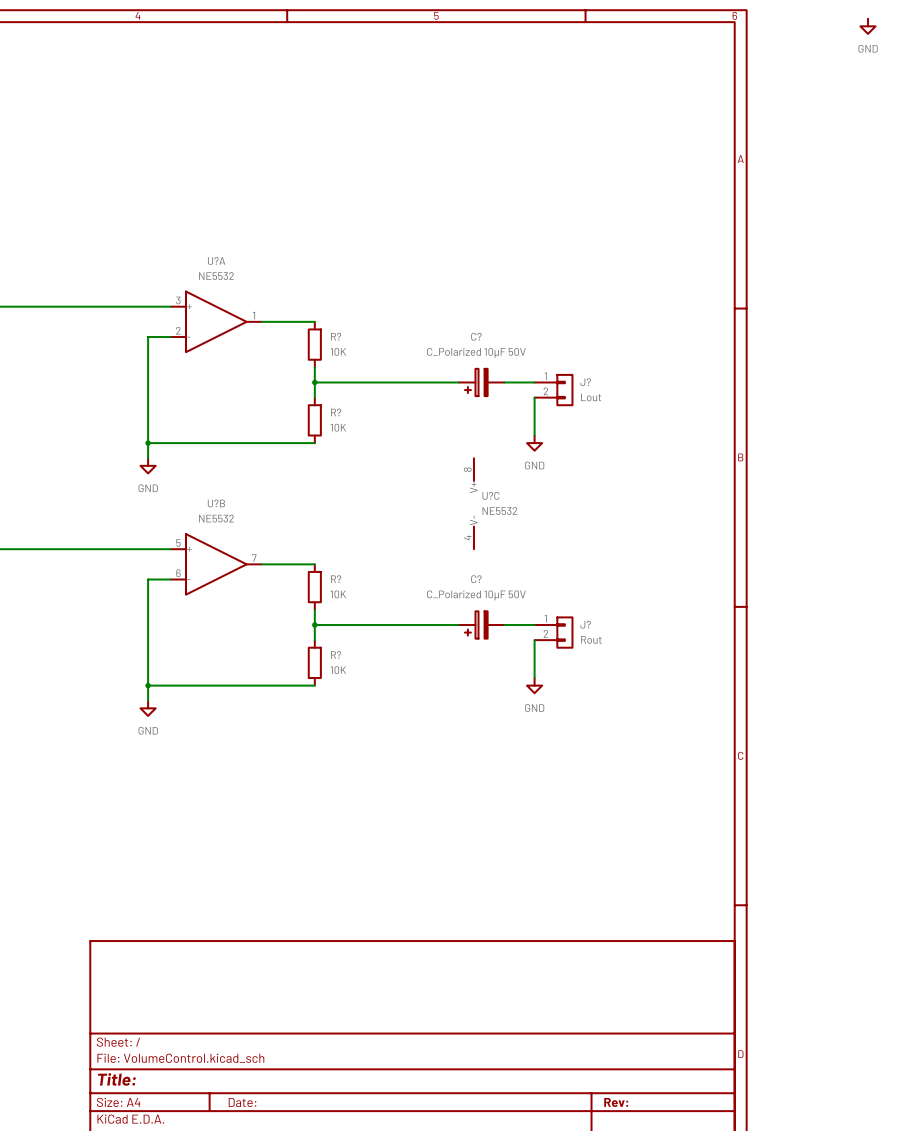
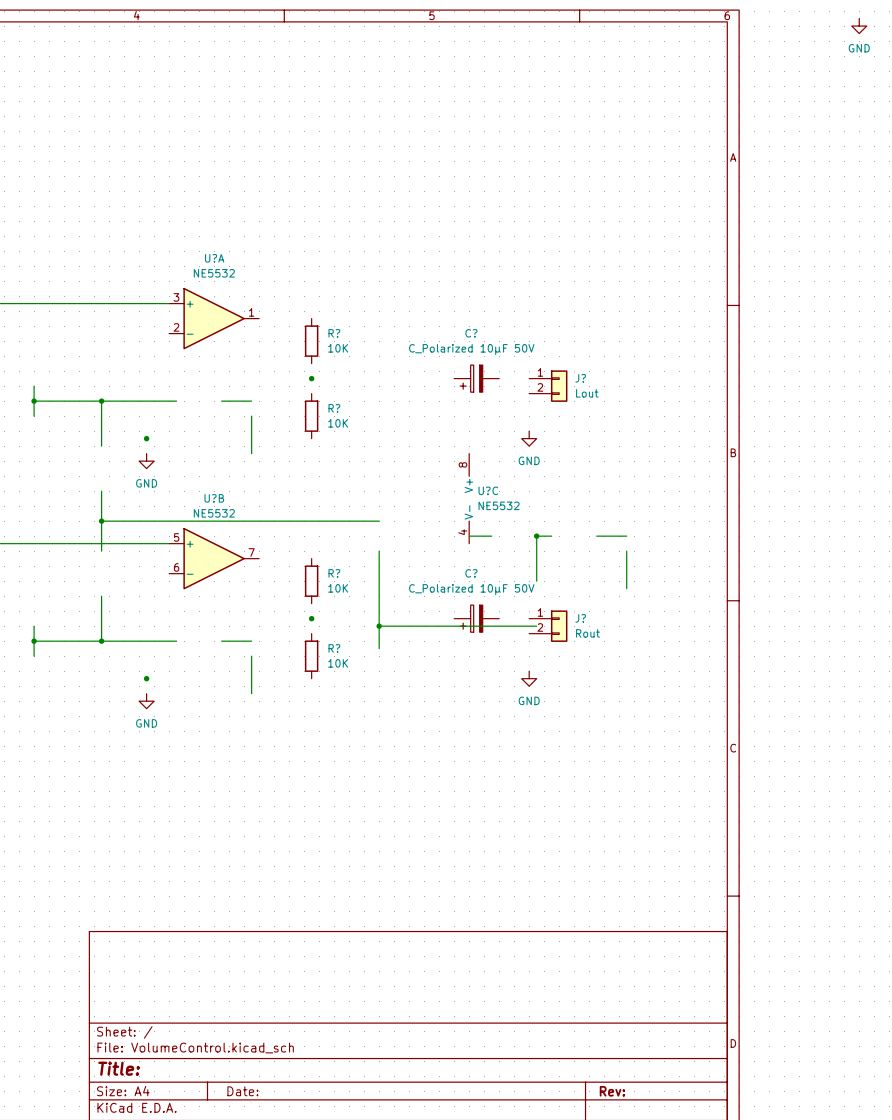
wire: (261, 321) (314, 321) -> none
wire: (170, 337) (148, 337) (148, 458) -> none
wire: (314, 367) (314, 397) -> none
wire: (314, 382) (458, 382) -> none
wire: (504, 382) (534, 382) -> none
wire: none -> (34, 386) (34, 416)
wire: (534, 397) (534, 435) -> none
wire: none -> (34, 401) (176, 401)
junction: none -> (34, 401)
wire: none -> (101, 401) (101, 446)
junction: none -> (101, 401)
wire: none -> (221, 401) (251, 401)
wire: none -> (251, 416) (251, 453)
wire: (148, 443) (314, 443) -> none
wire: none -> (101, 491) (101, 551)
wire: none -> (101, 521) (379, 521)
junction: none -> (101, 521)
wire: none -> (469, 536) (491, 536)
junction: none -> (536, 536)
wire: none -> (551, 536) (536, 536) (536, 581)
wire: none -> (379, 551) (379, 648)
wire: (261, 564) (314, 564) -> none
wire: (170, 579) (148, 579) (148, 700) -> none
wire: none -> (101, 596) (101, 641)
wire: (314, 609) (314, 640) -> none
wire: (314, 624) (458, 624) -> none
wire: (504, 624) (534, 624) -> (596, 536) (626, 536)
wire: none -> (34, 626) (34, 656)
wire: none -> (379, 626) (536, 626)
junction: none -> (379, 626)
wire: (534, 640) (534, 678) -> (626, 551) (626, 588)
wire: none -> (34, 641) (176, 641)
junction: none -> (34, 641)
junction: none -> (101, 641)
wire: none -> (221, 641) (251, 641)
wire: none -> (251, 656) (251, 693)
wire: (148, 685) (314, 685) -> none

